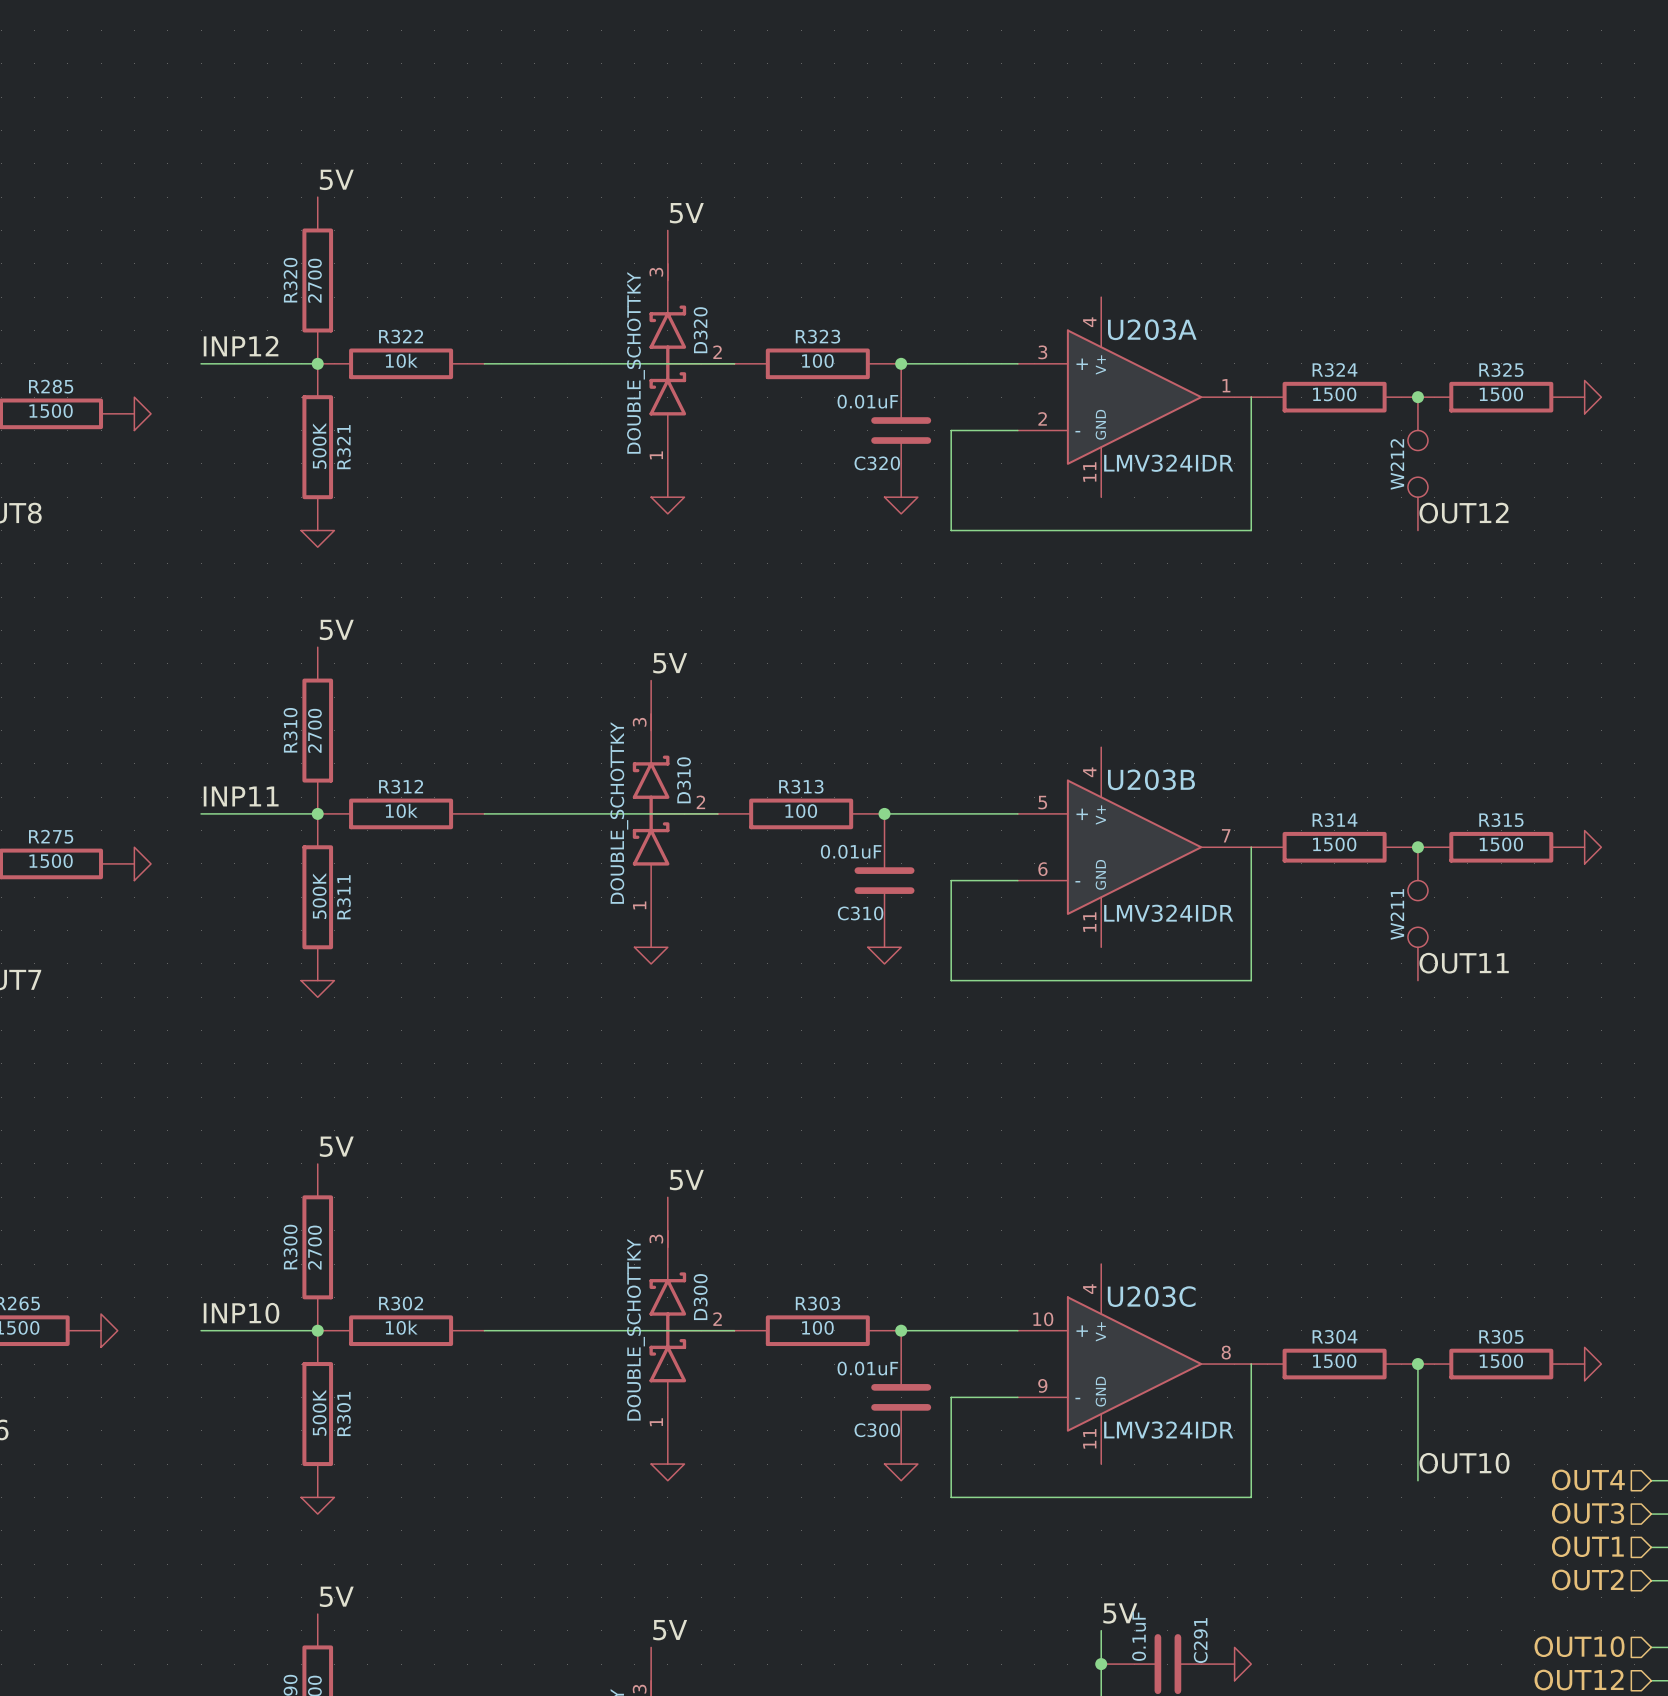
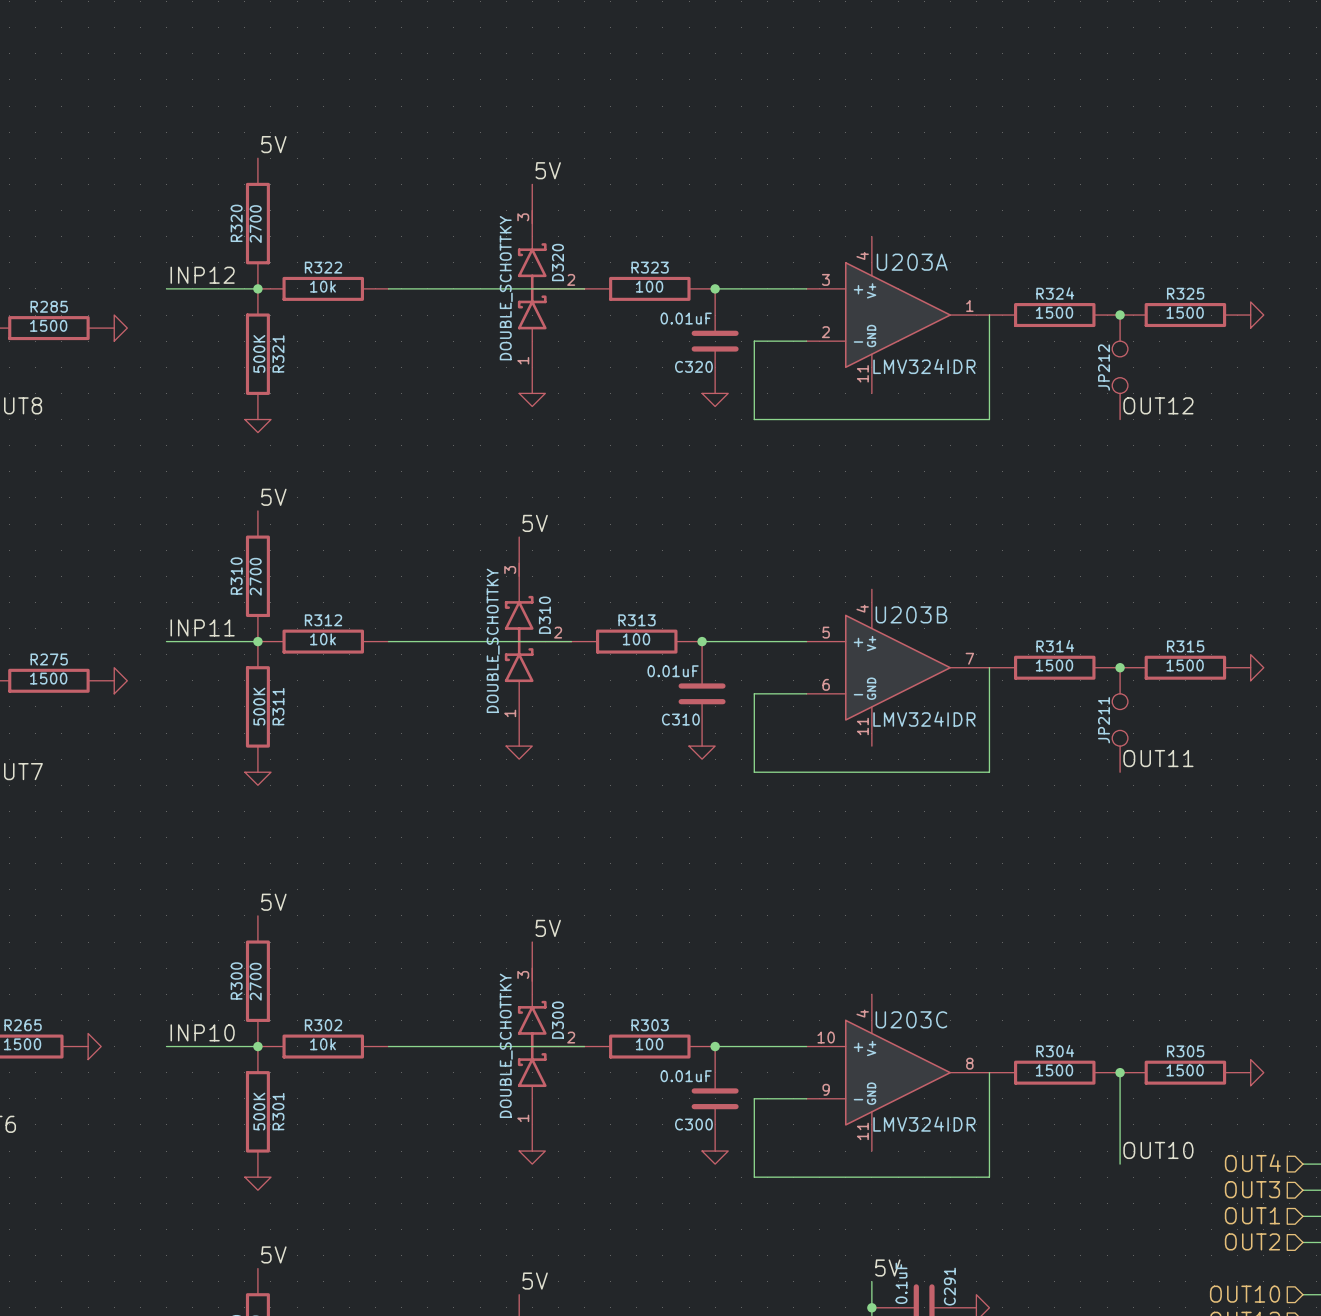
W212 name: W212 (1397, 464) -> JP212 (1104, 367)
W211 name: W211 (1397, 914) -> JP211 (1104, 720)

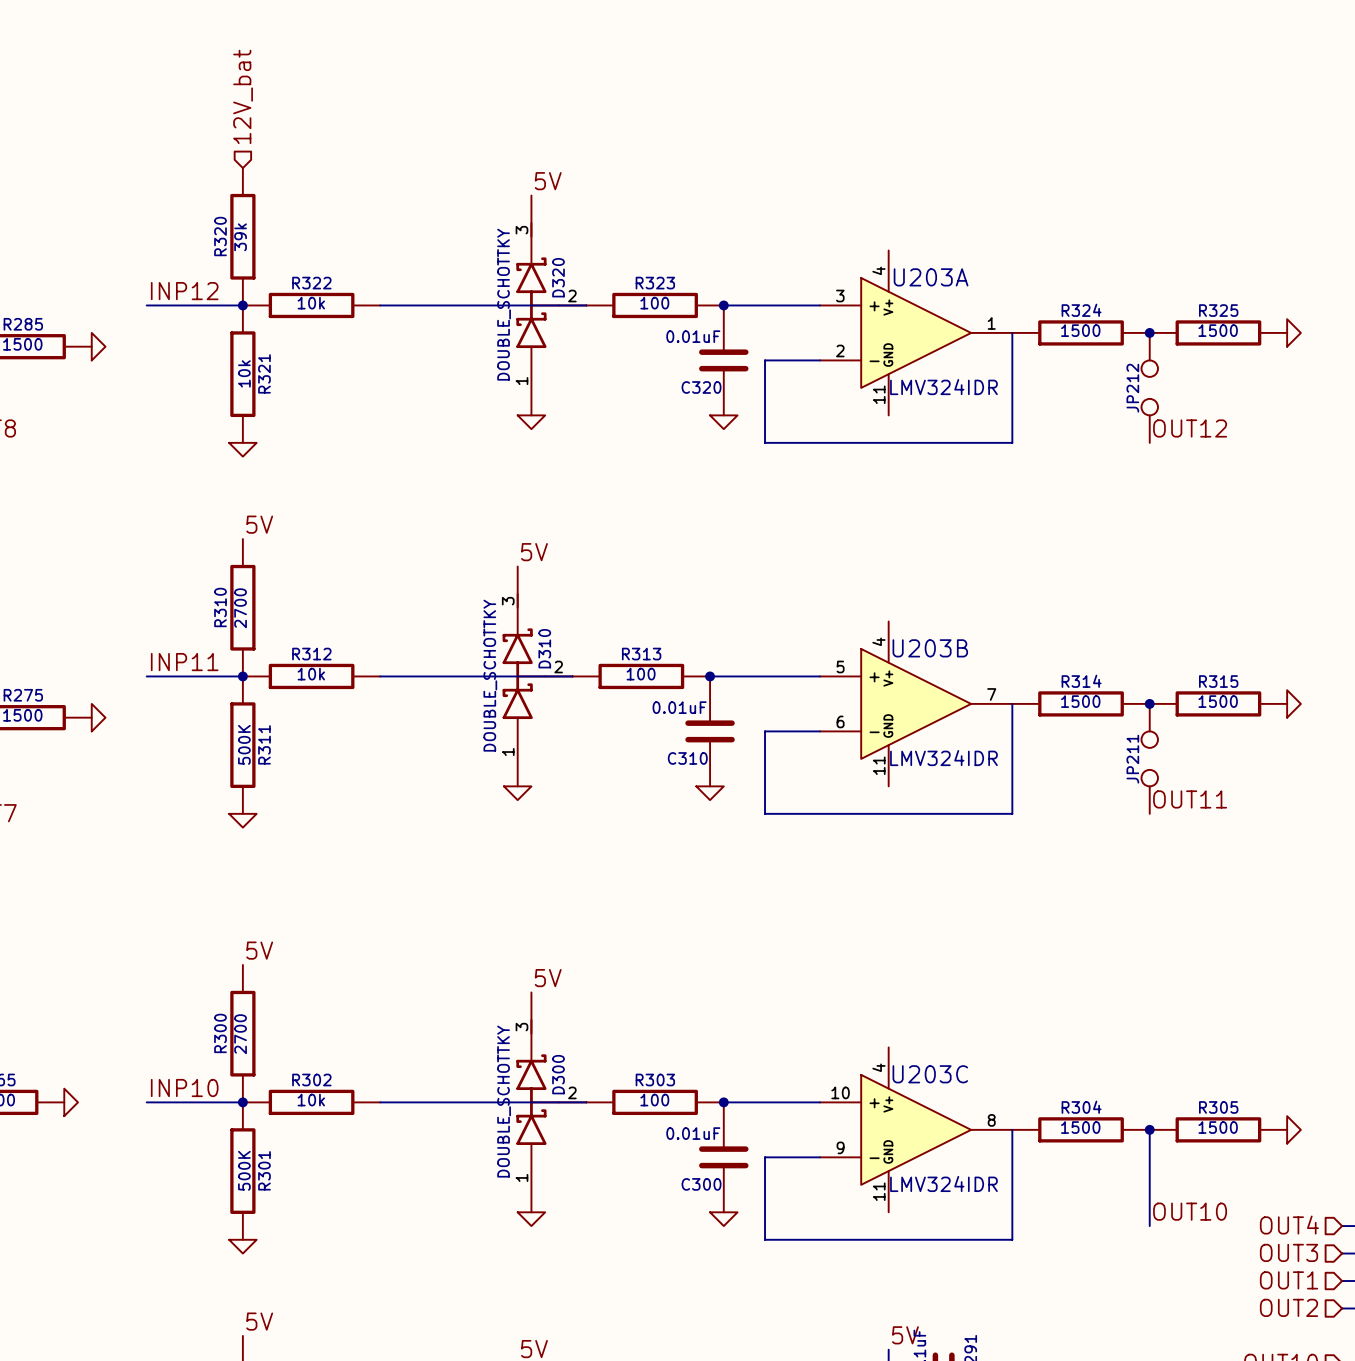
hierarchical label: none -> 12V_bat (243, 96)
label: 5V (273, 144) -> none
R320 value: 2700 (255, 224) -> 39k (240, 237)
R321 value: 500K (259, 353) -> 10k (244, 373)

